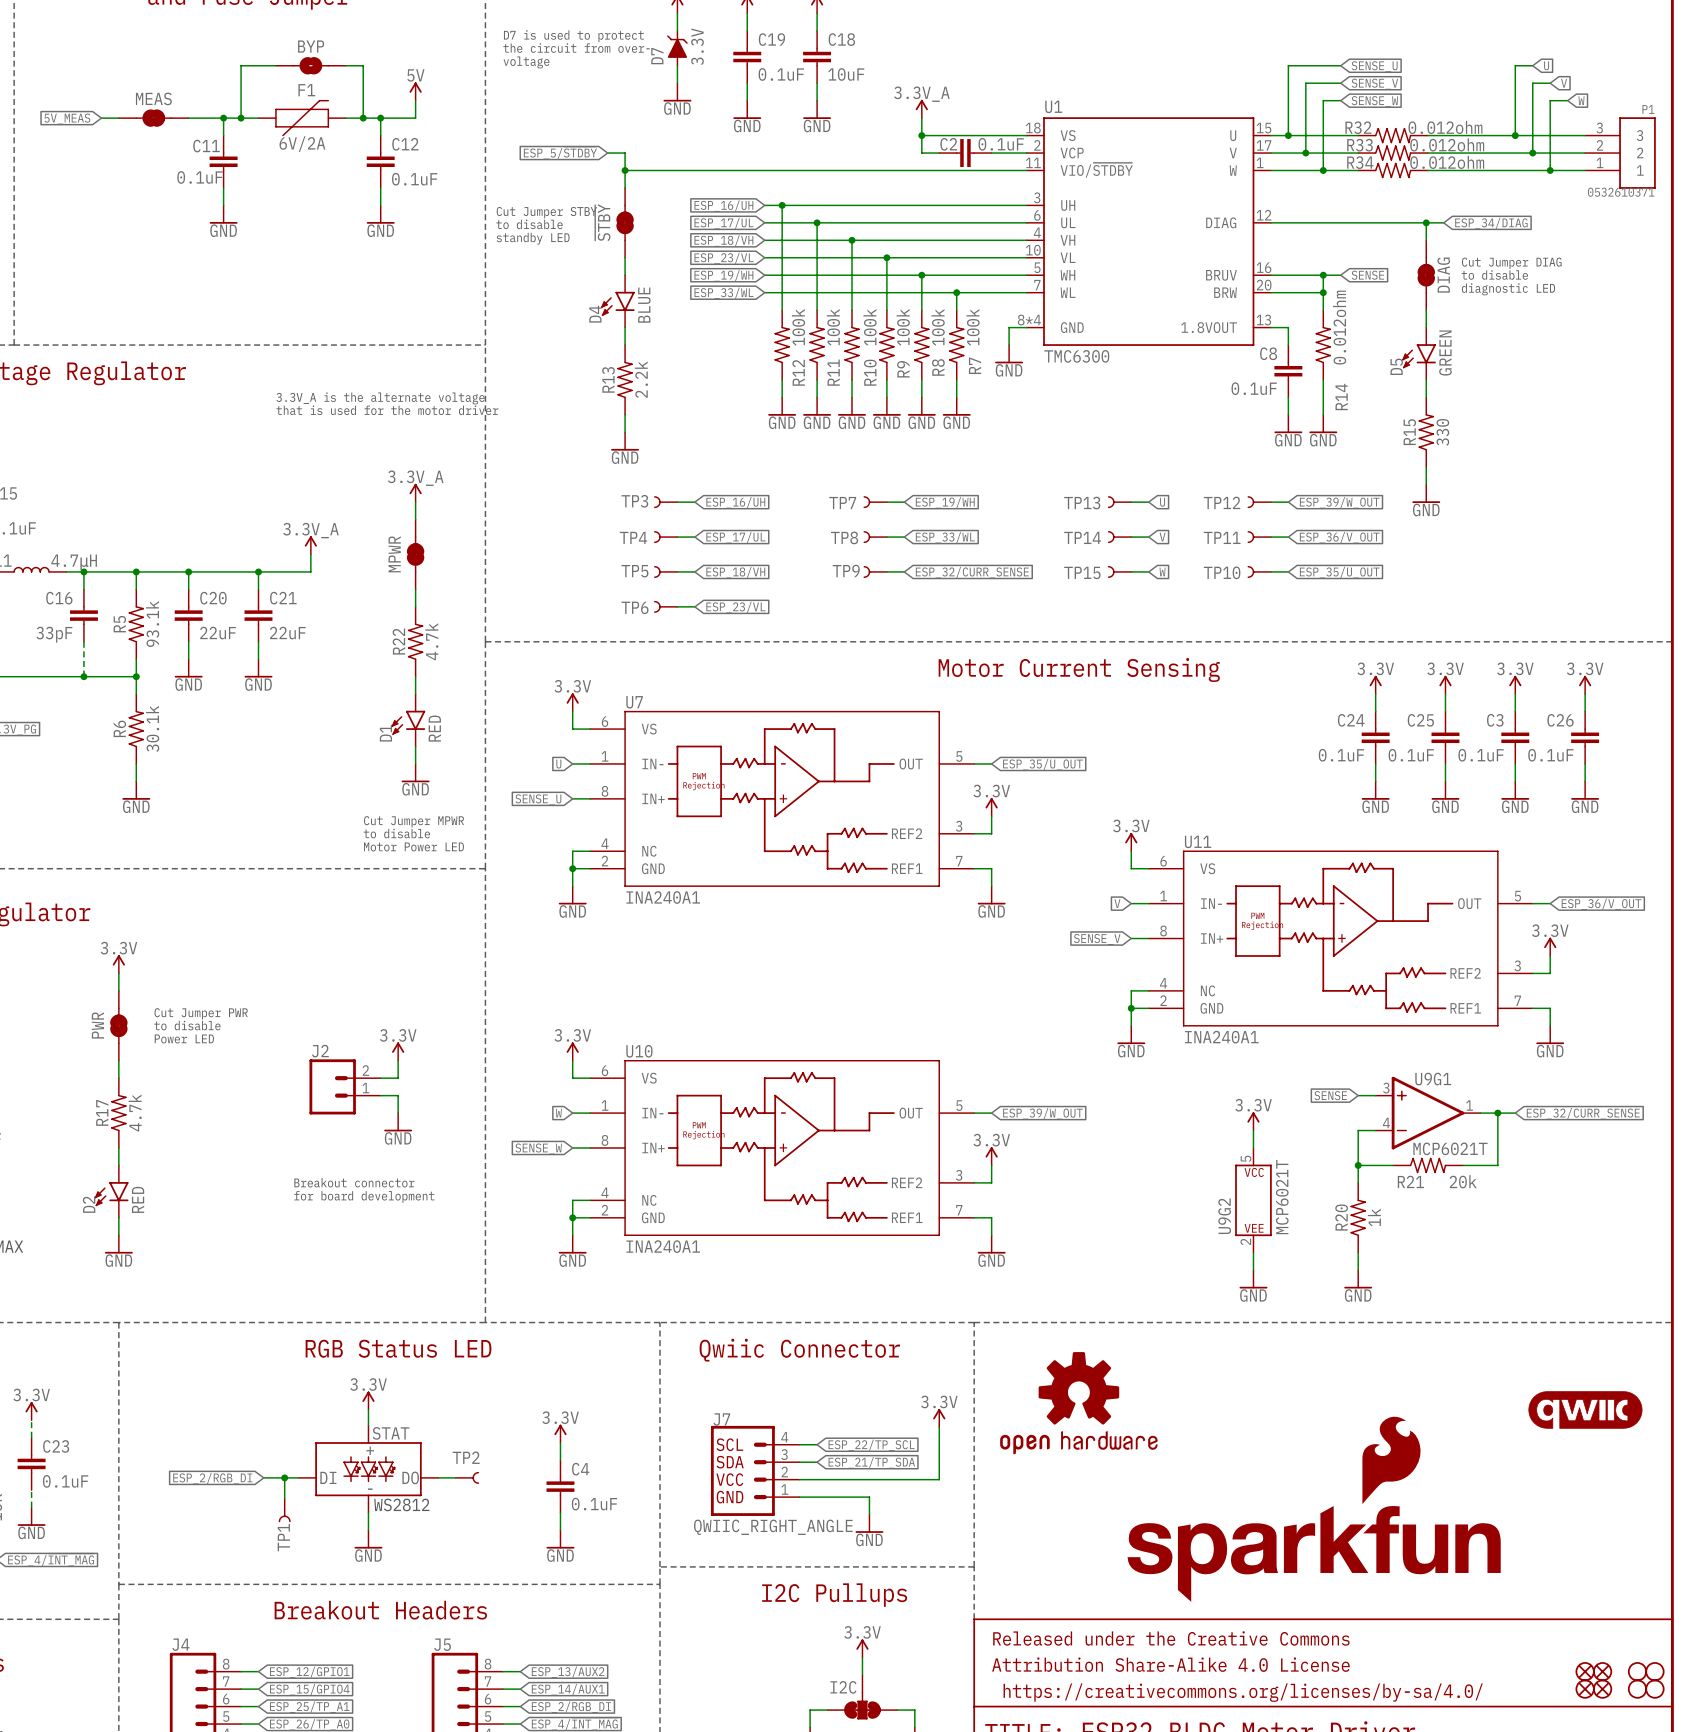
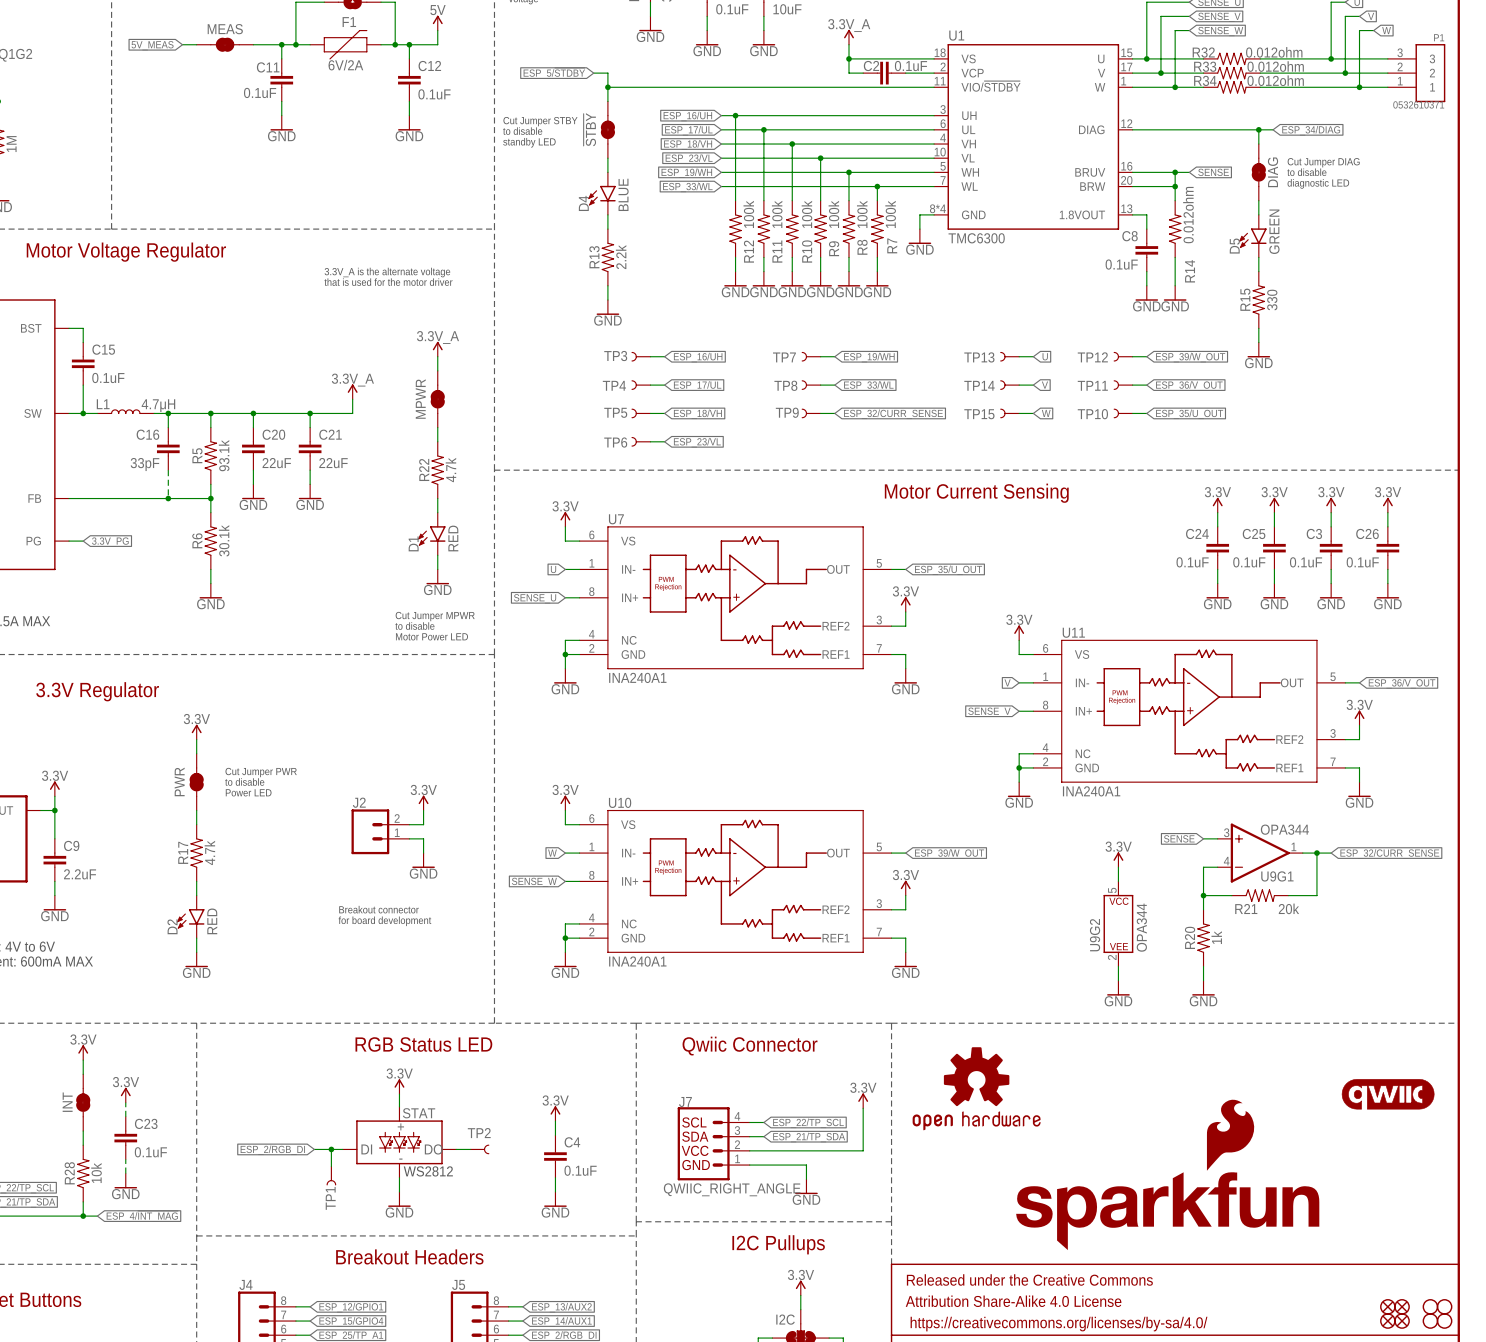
U9G1 name position: U9G1 (1433, 1079) -> U9G1 (1277, 876)
U9G1 value: MCP6021T (1450, 1148) -> OPA344 (1284, 829)
U9G2 value: MCP6021T (1282, 1197) -> OPA344 (1141, 927)

